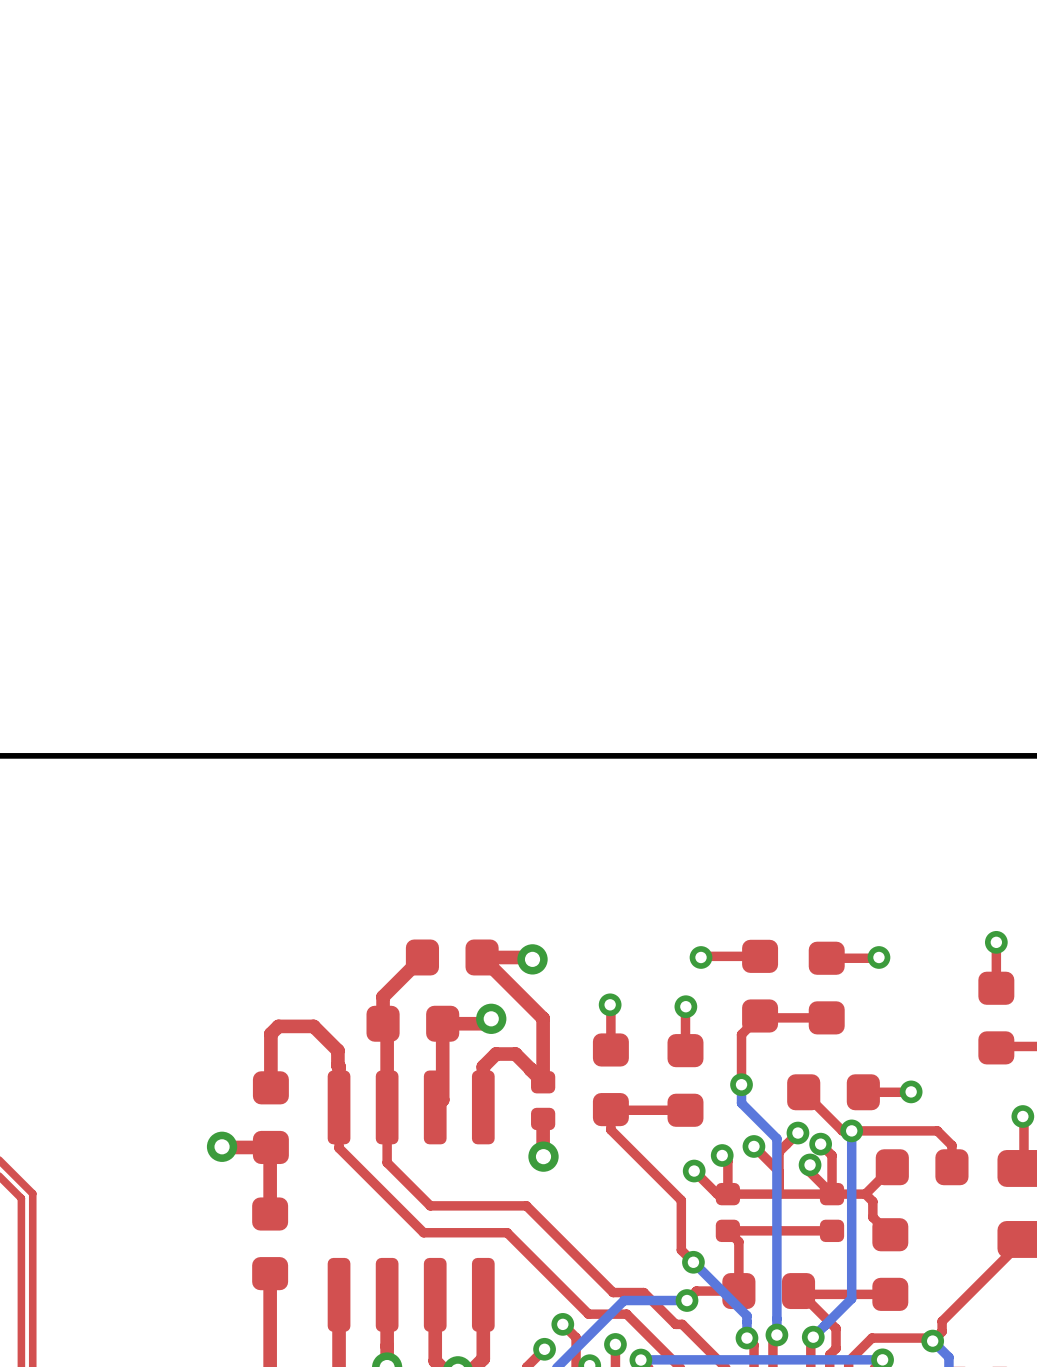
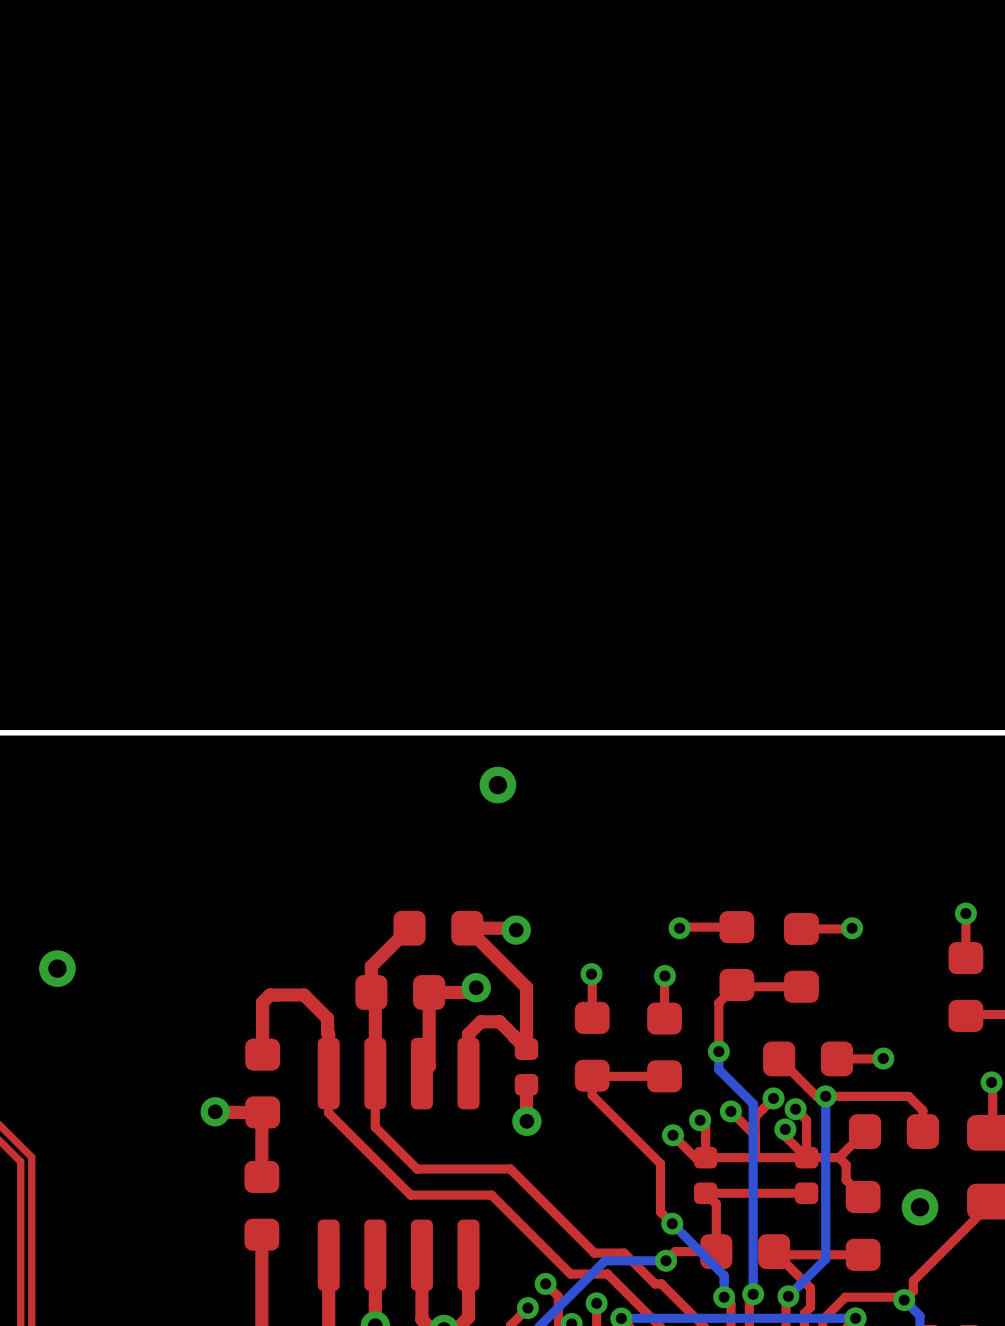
via: none -> (497, 785)
via: none -> (57, 968)
via: none -> (920, 1207)

